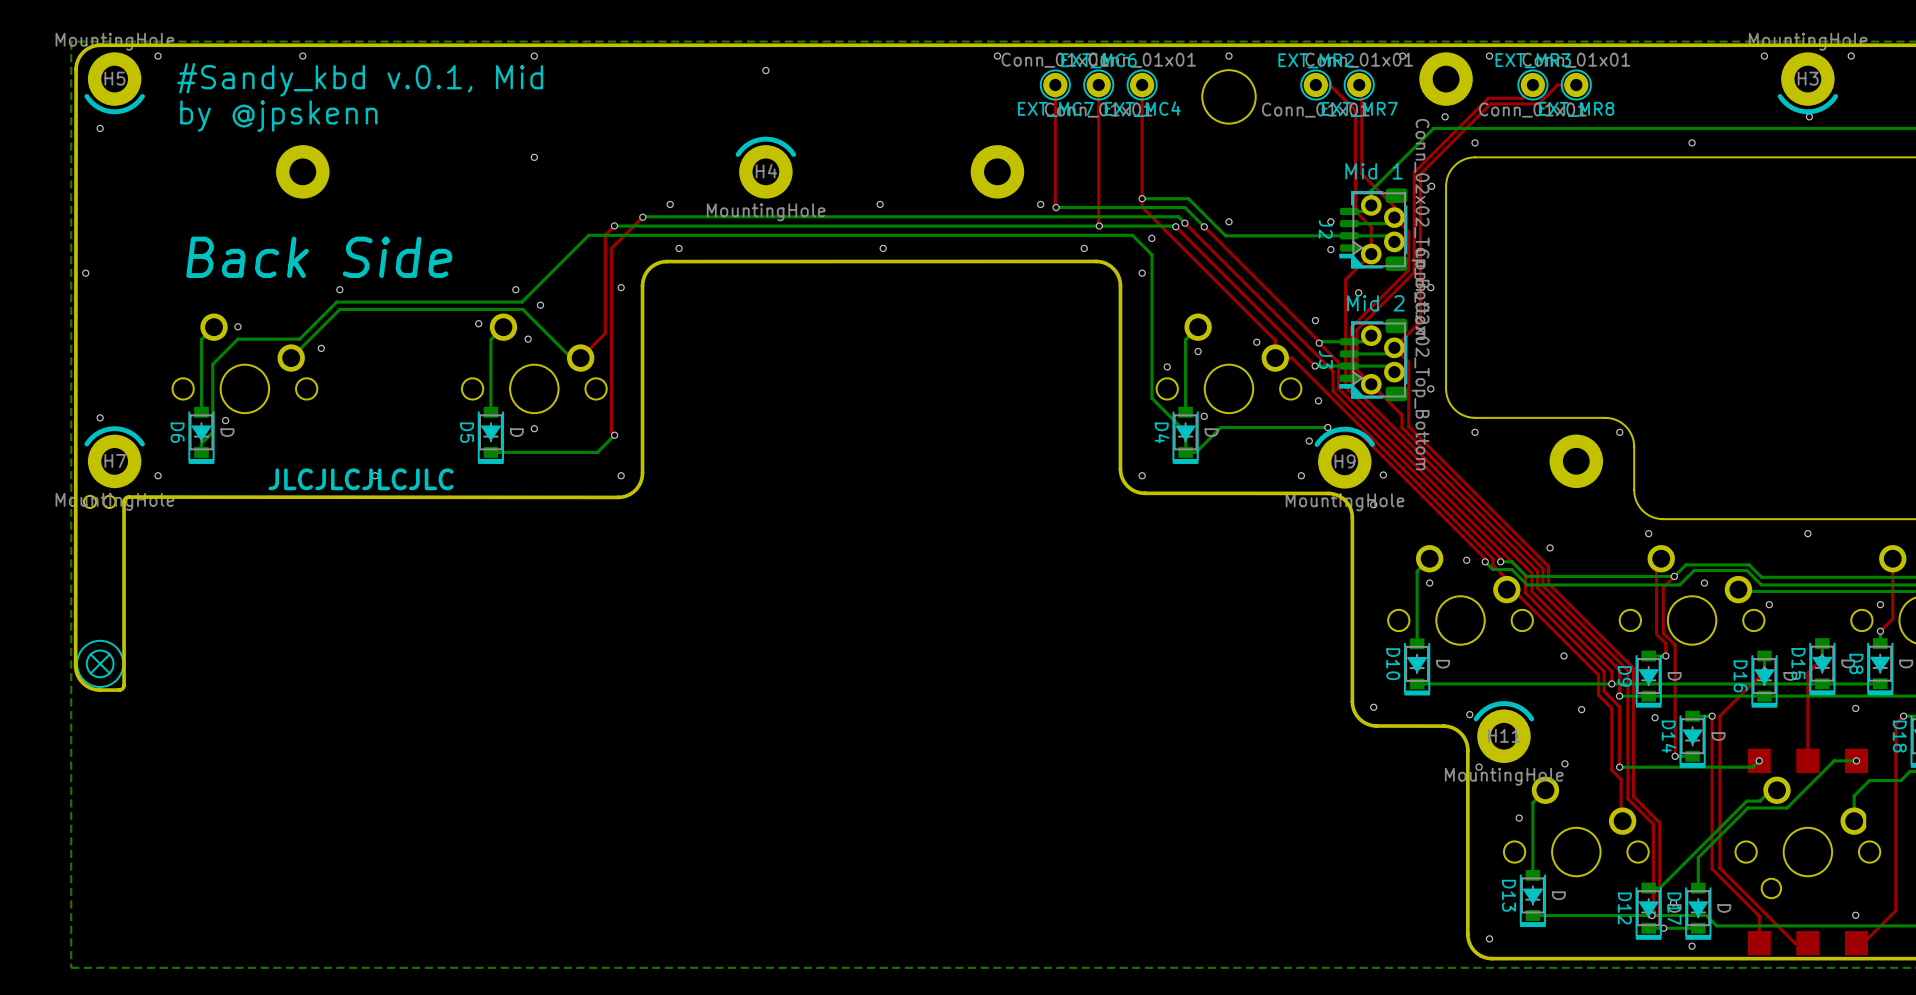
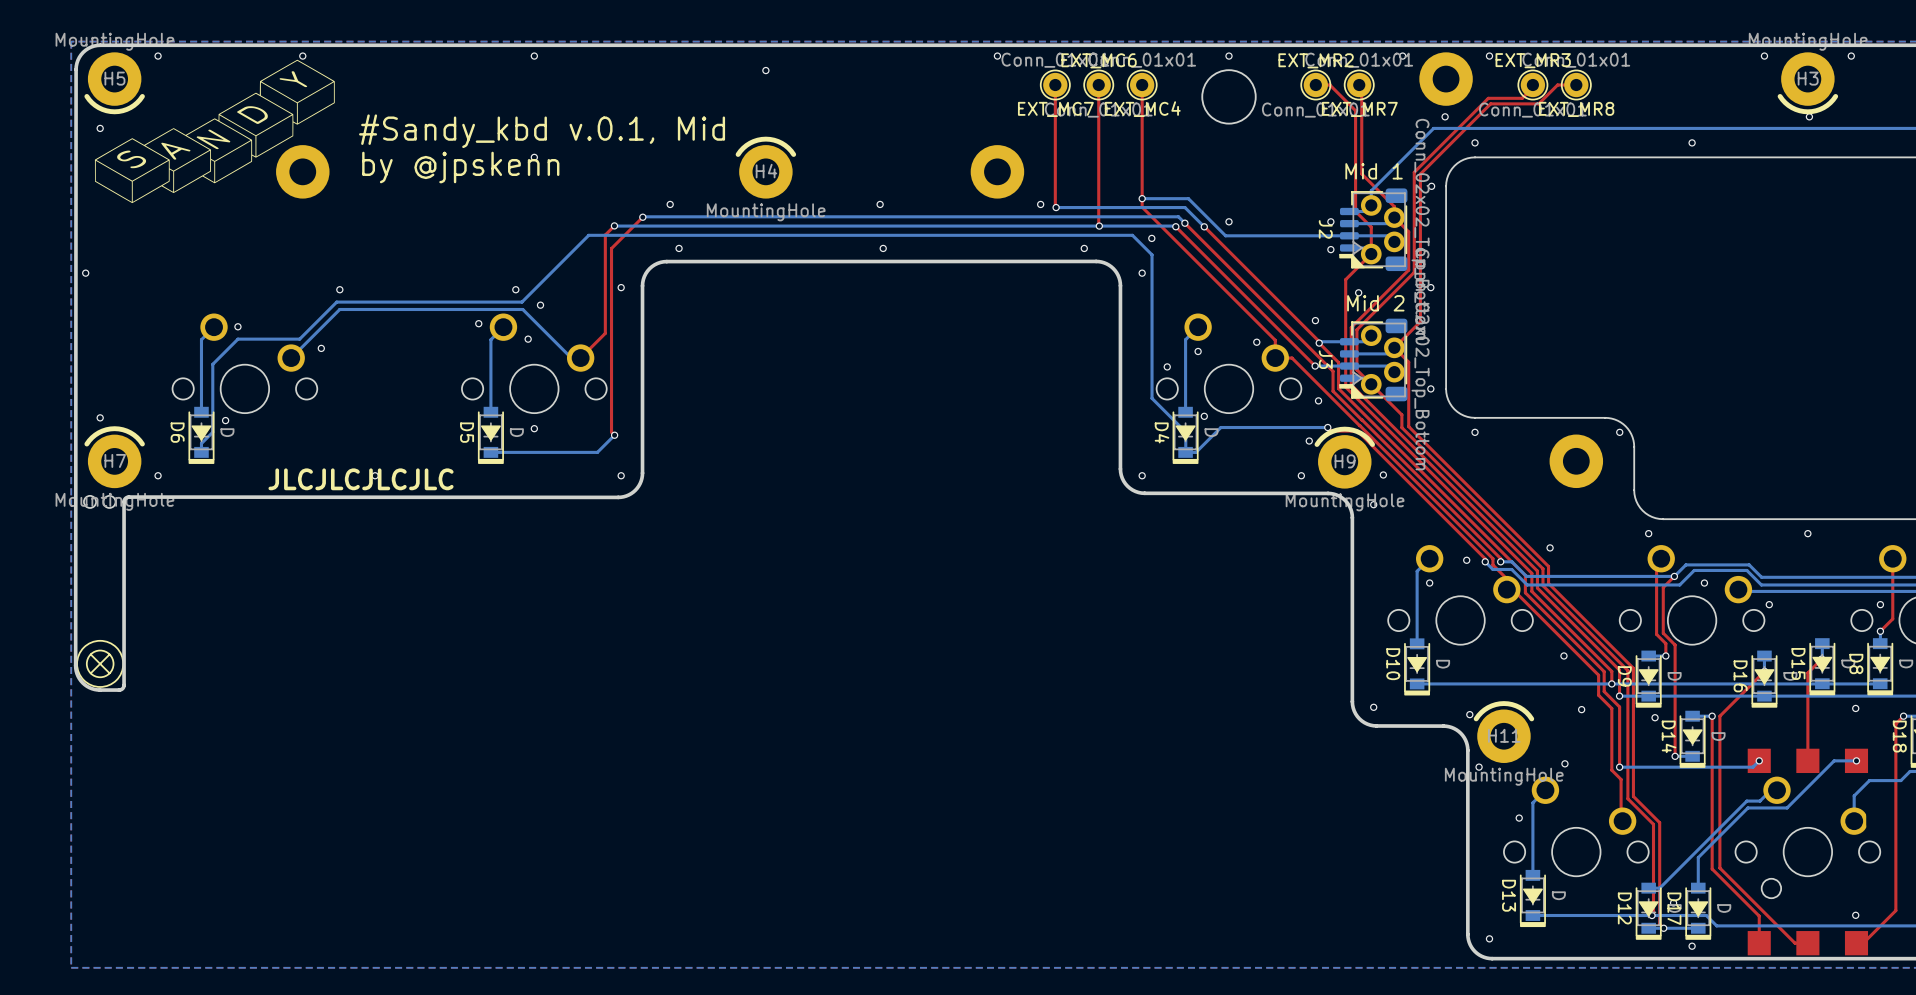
drawing: none -> [94, 59, 335, 204]
text position: #Sandy_kbd v.0.1, Mid (360, 79) -> #Sandy_kbd v.0.1, Mid (542, 131)
text position: by @jpskenn (278, 116) -> by @jpskenn (460, 167)
text: Back Side (319, 257) -> none

